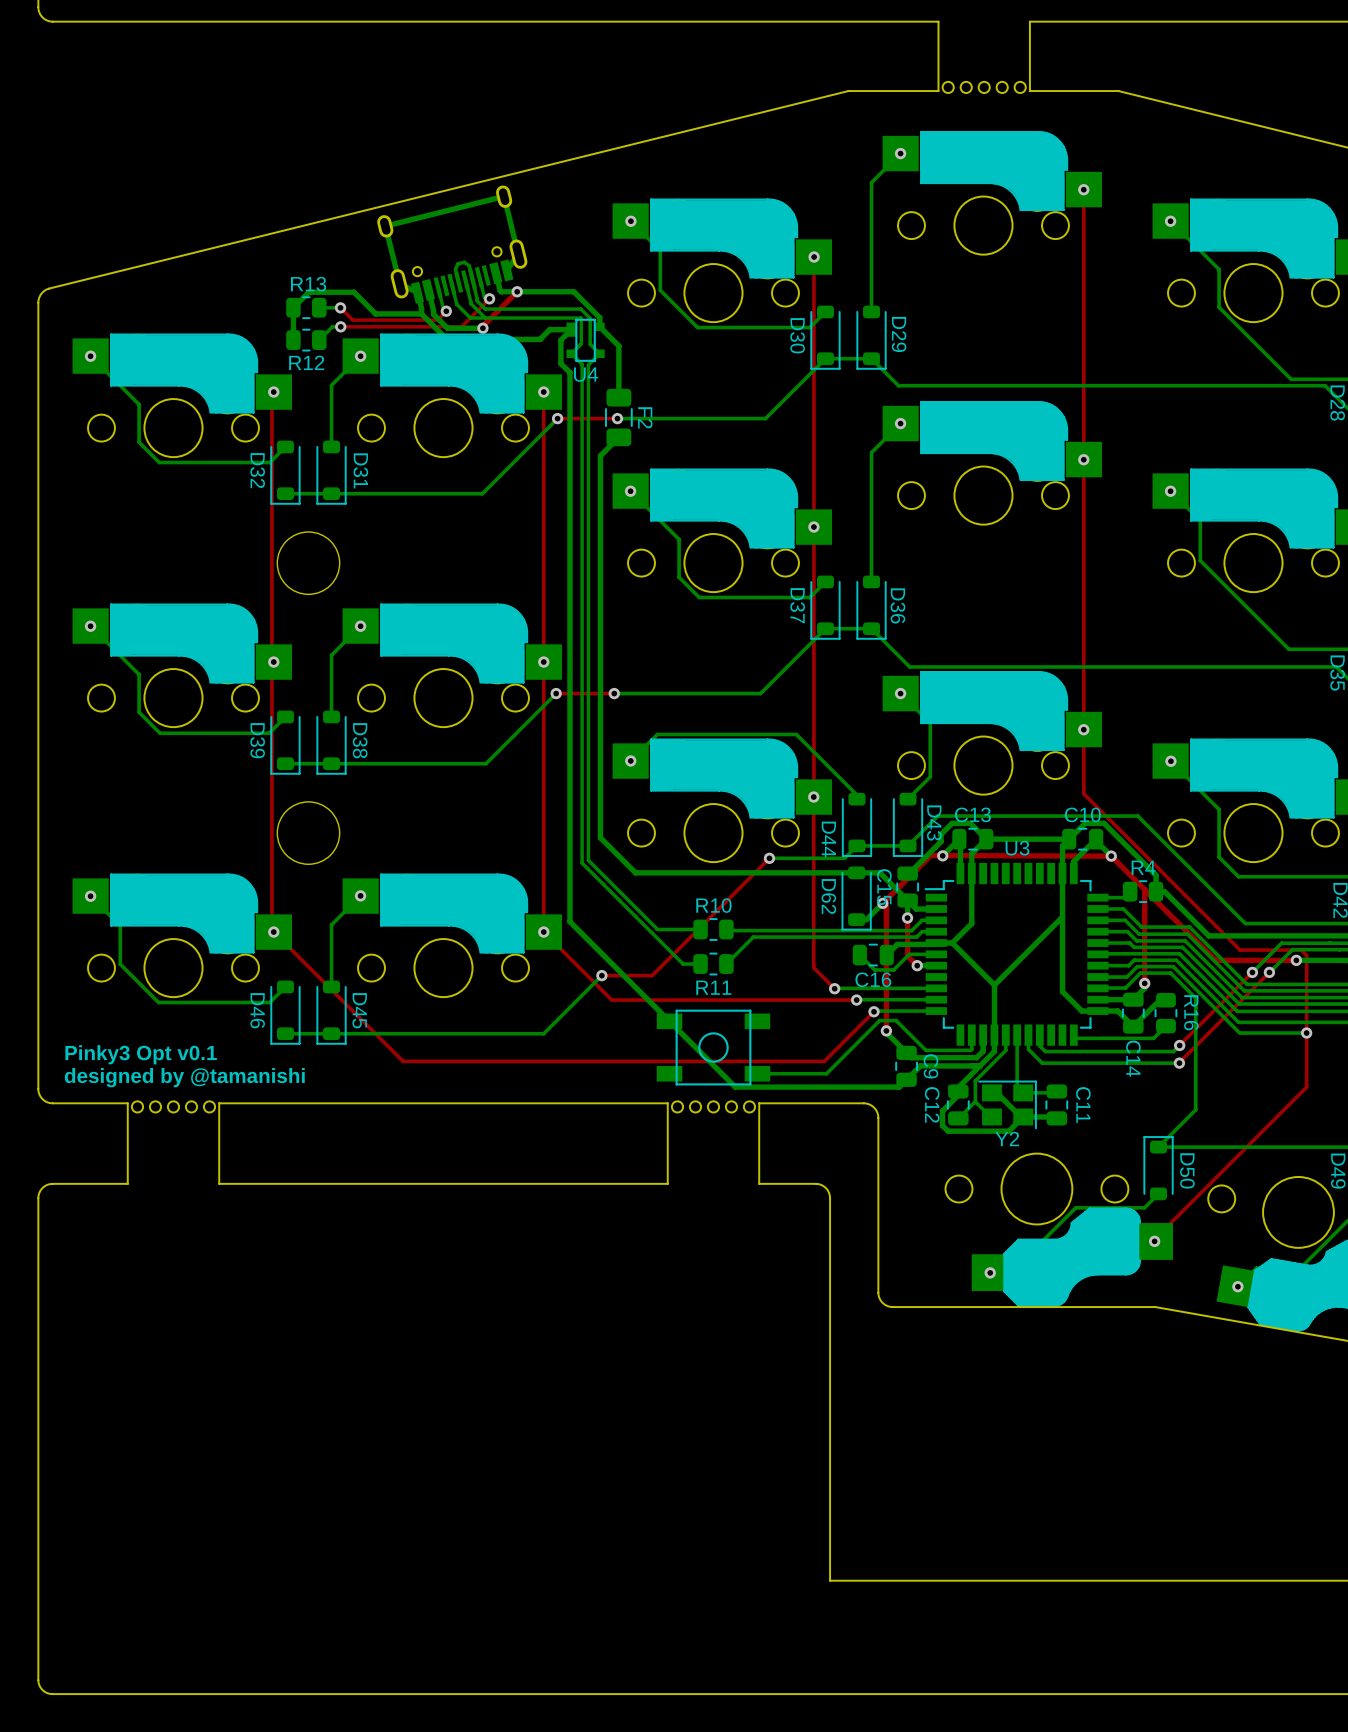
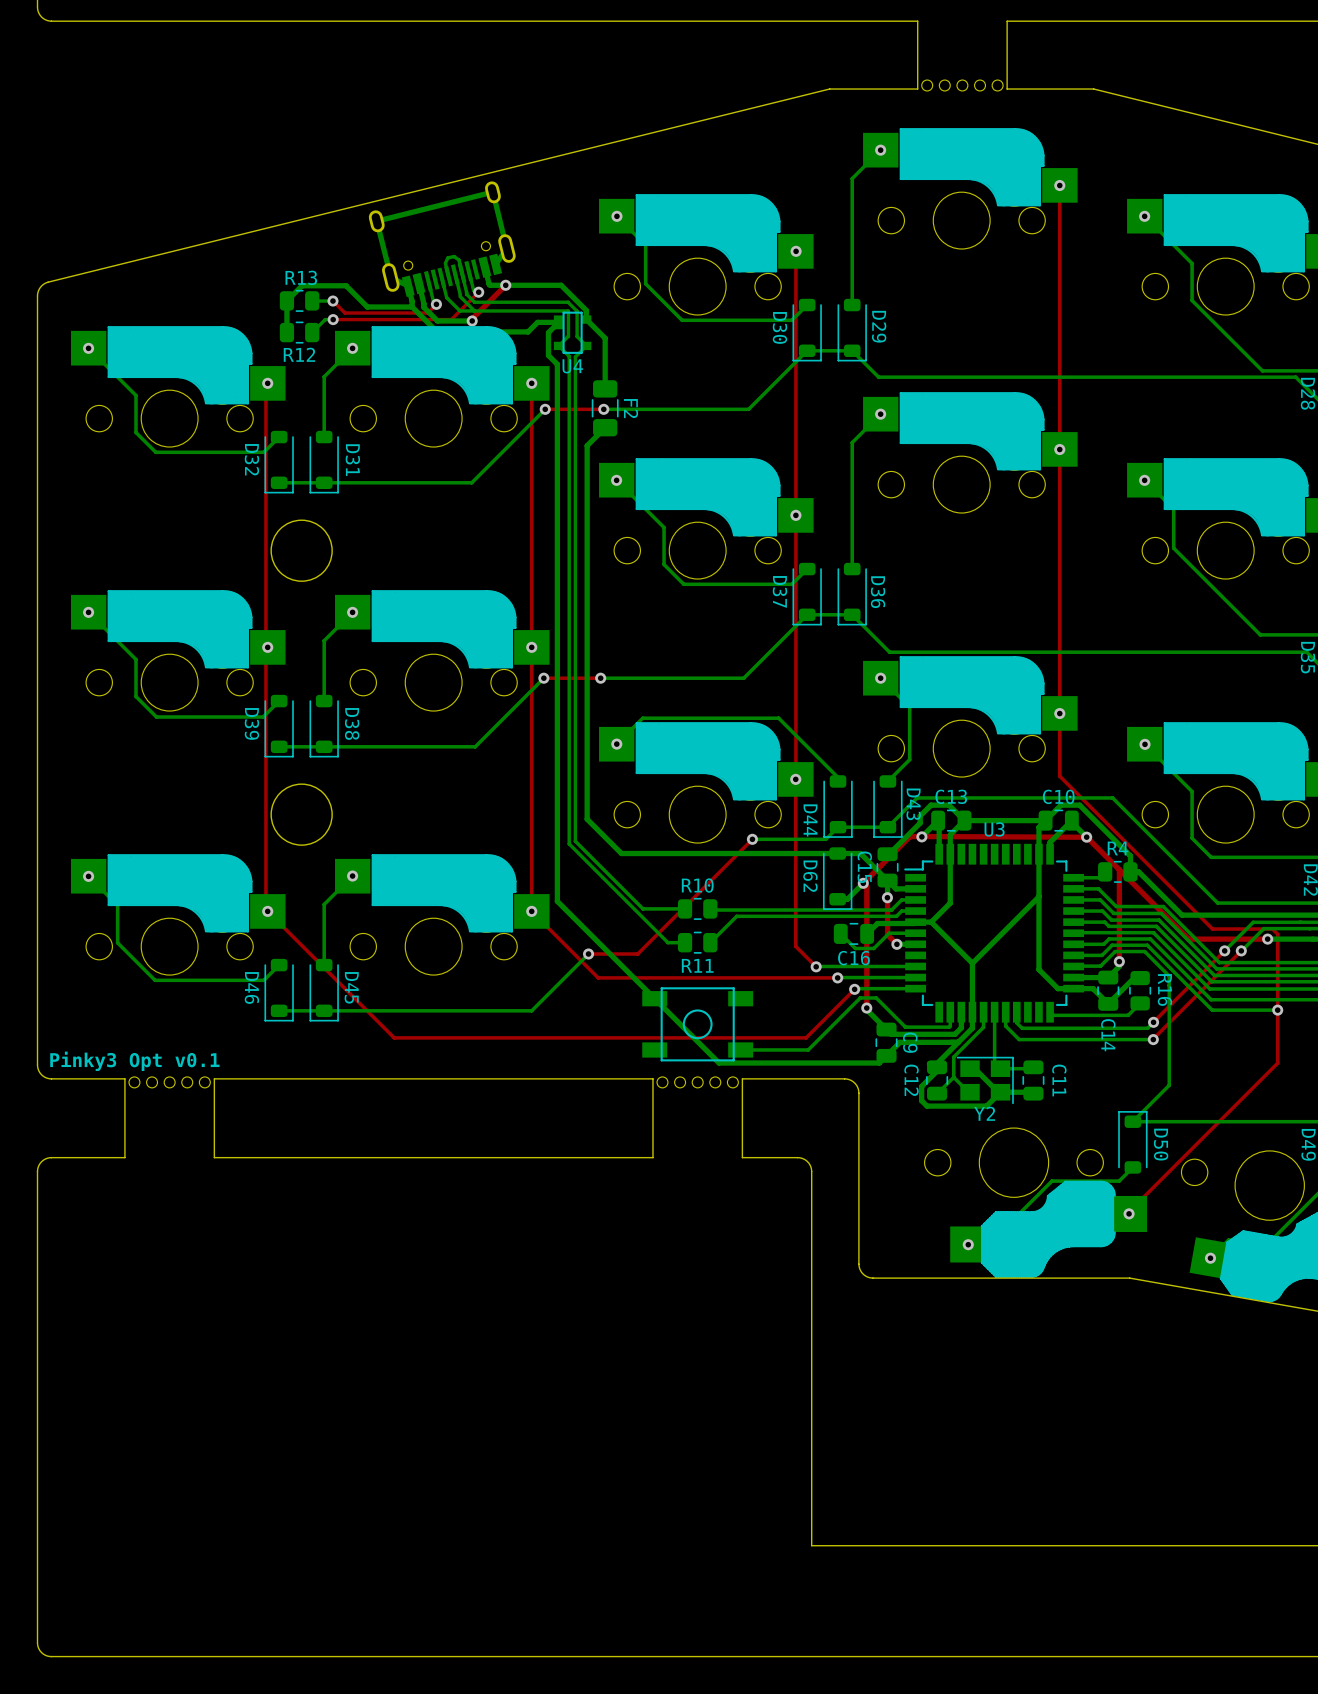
text position: Pinky3 Opt v0.1 (141, 1054) -> Pinky3 Opt v0.1 (134, 1061)
text: designed by @tamanishi (184, 1077) -> none

